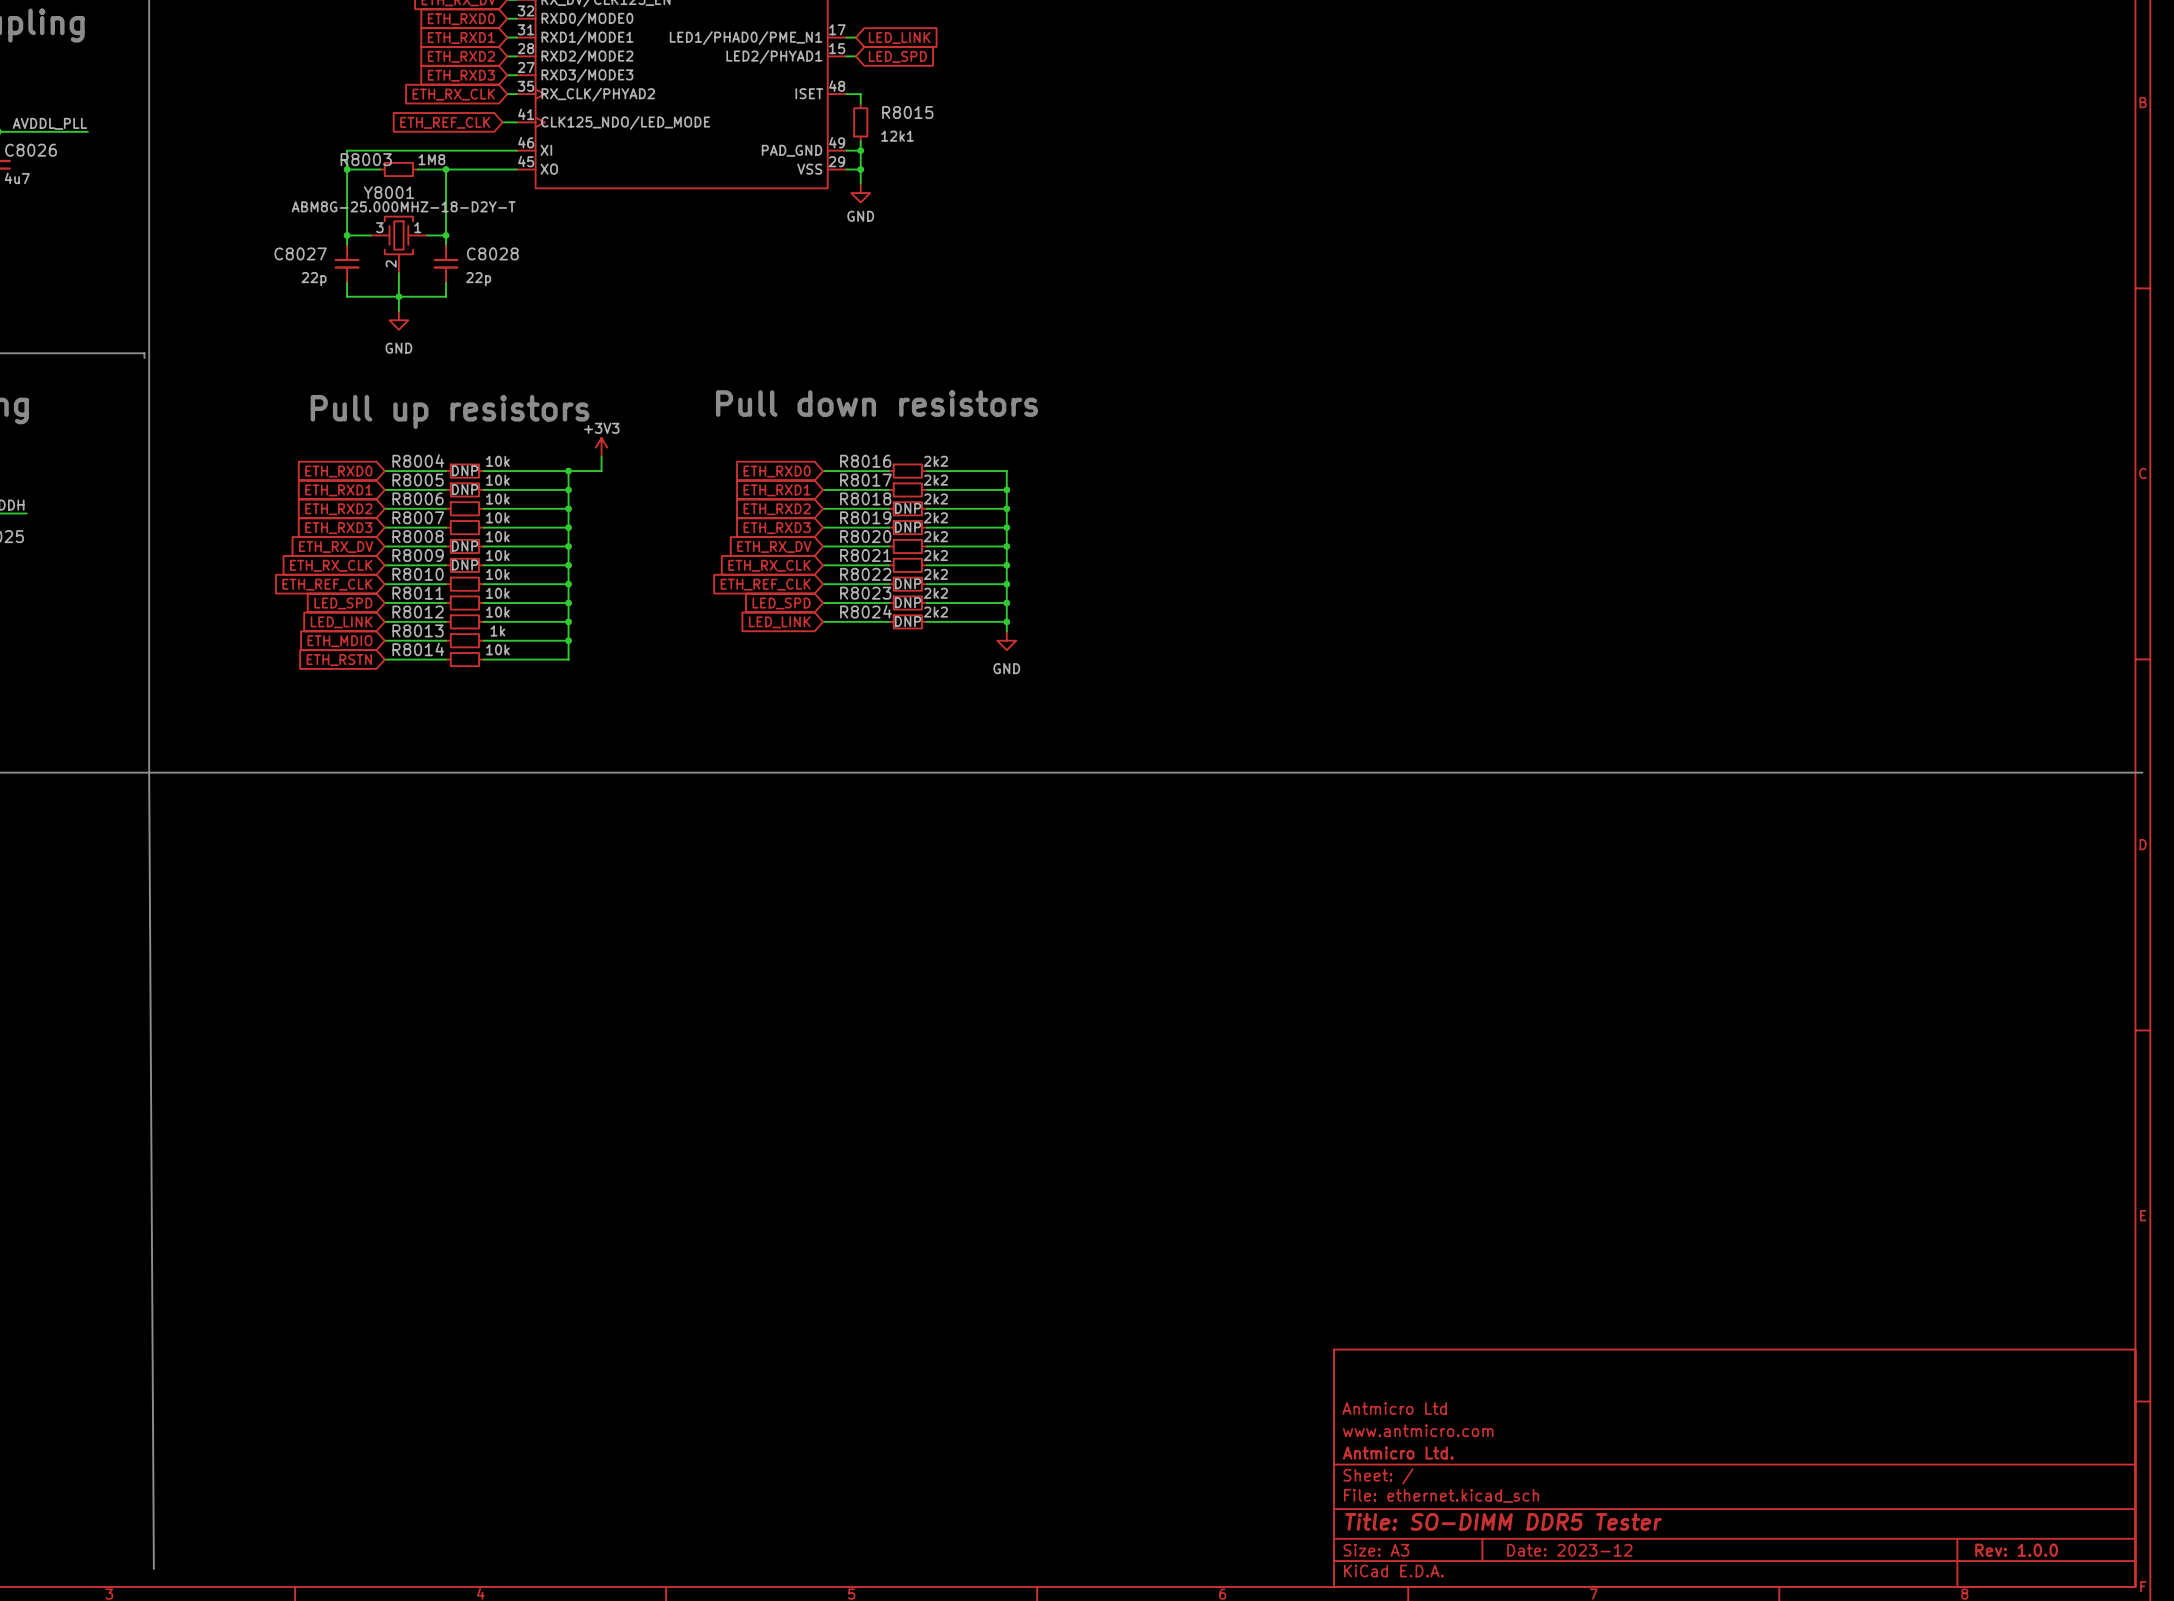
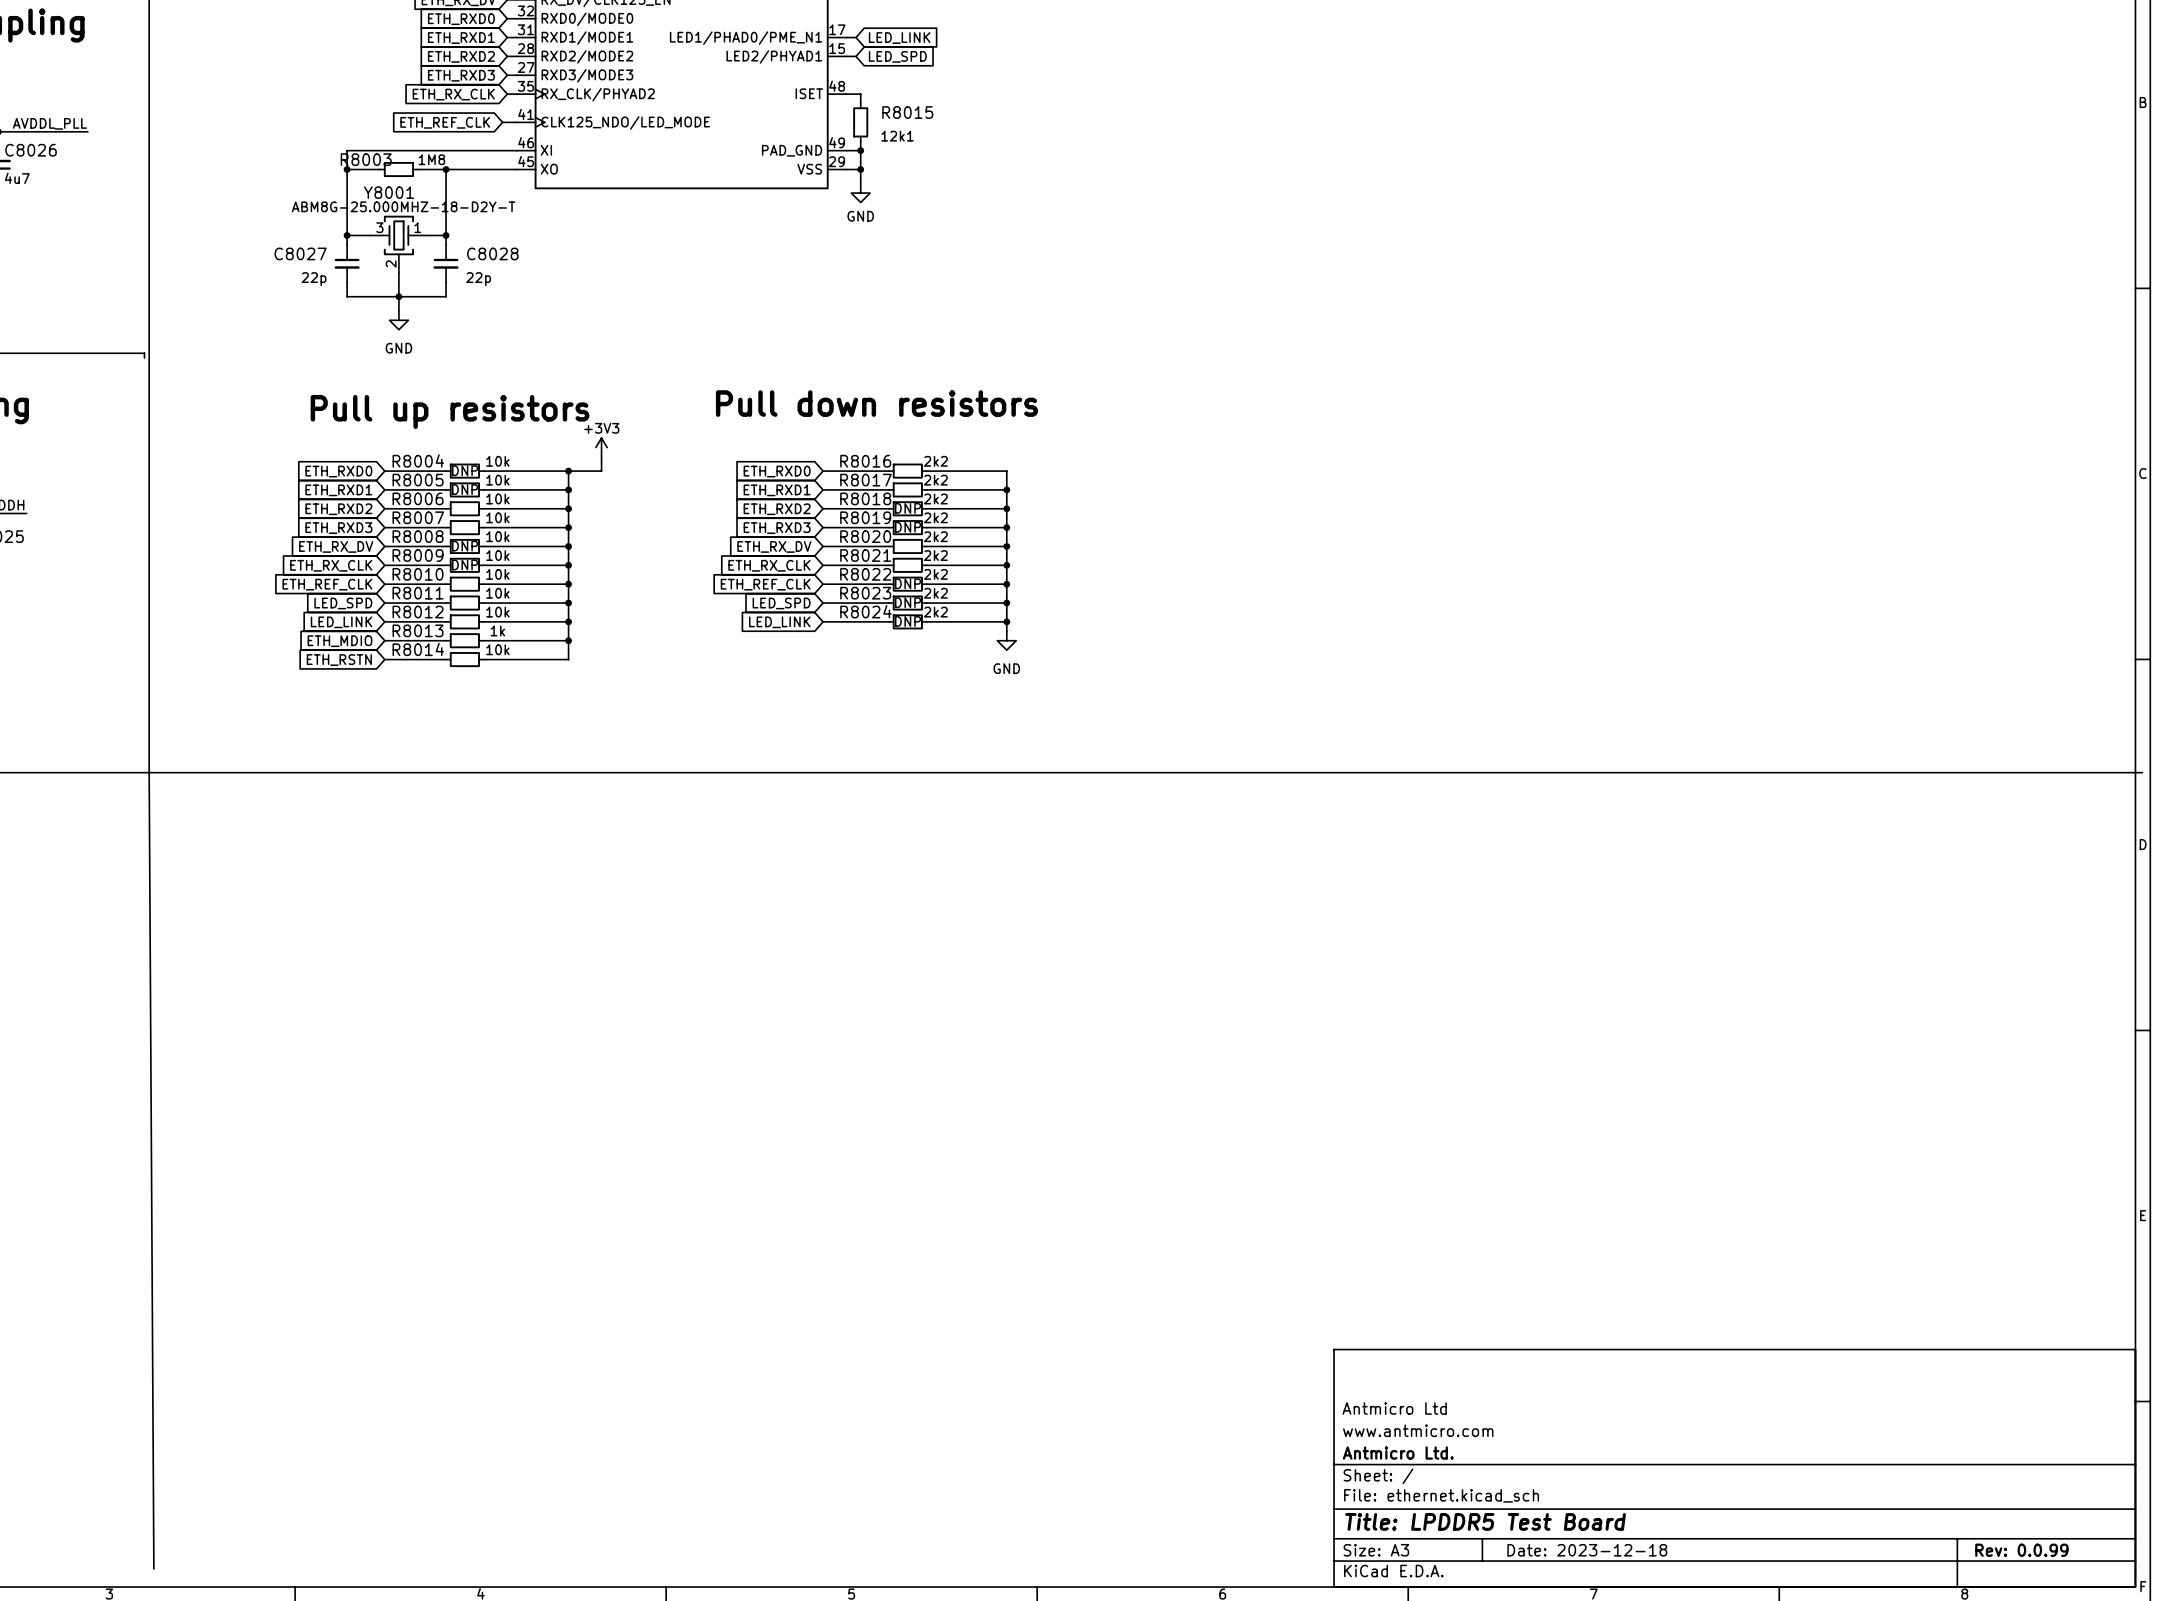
title block: Title: SO-DIMM DDR5 Tester (1503, 1521) -> Title: LPDDR5 Test Board (1485, 1521)
title block: Date: 2023-12 (1569, 1550) -> Date: 2023-12-18 (1587, 1550)
title block: Rev: 1.0.0 (2016, 1550) -> Rev: 0.0.99 (2021, 1550)

